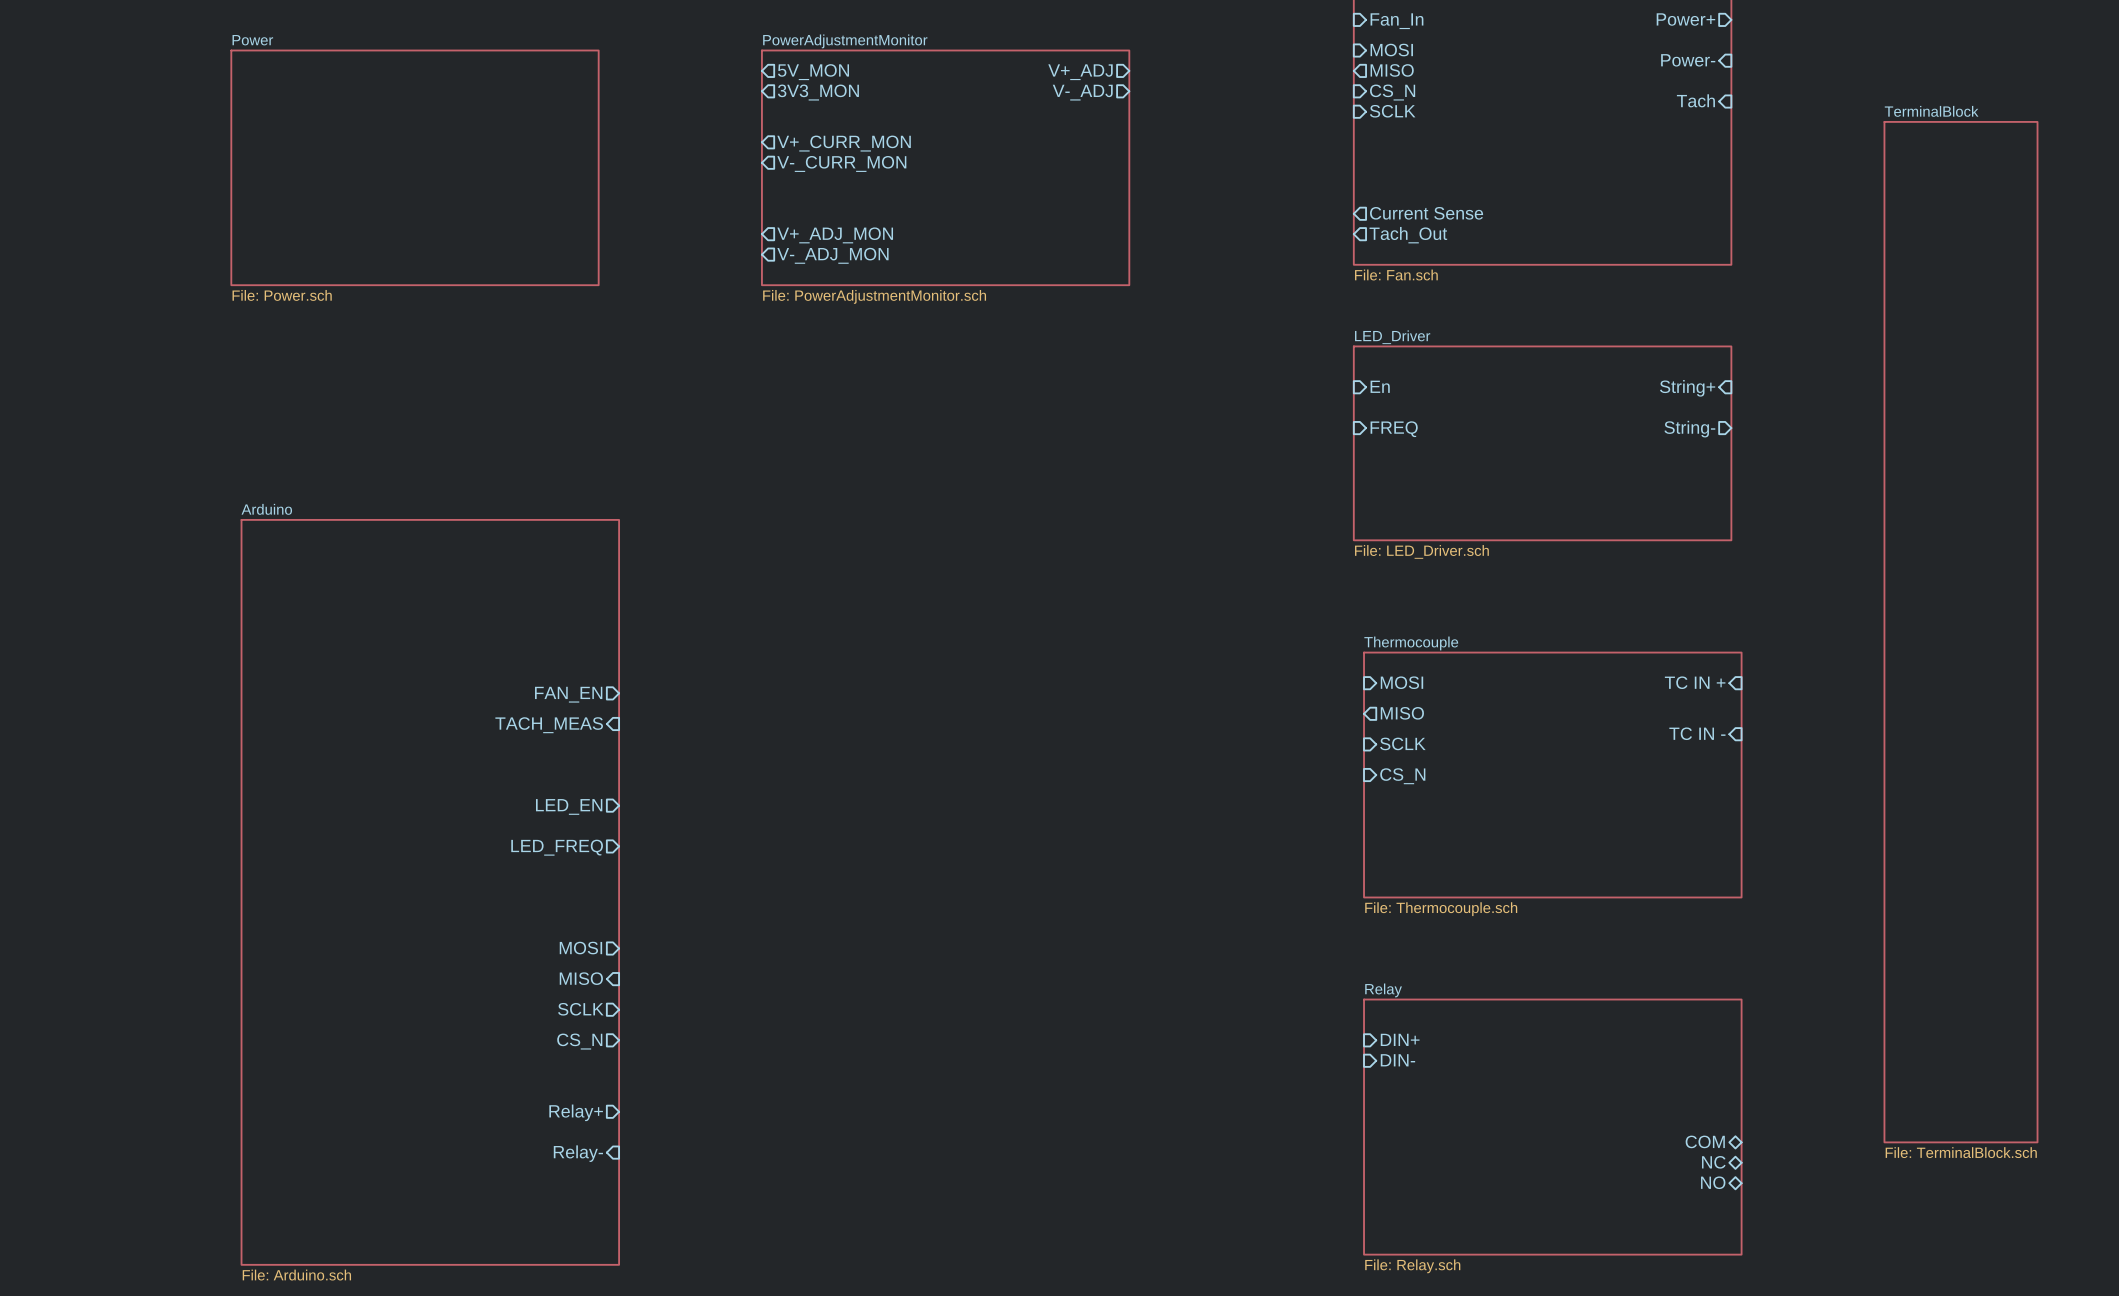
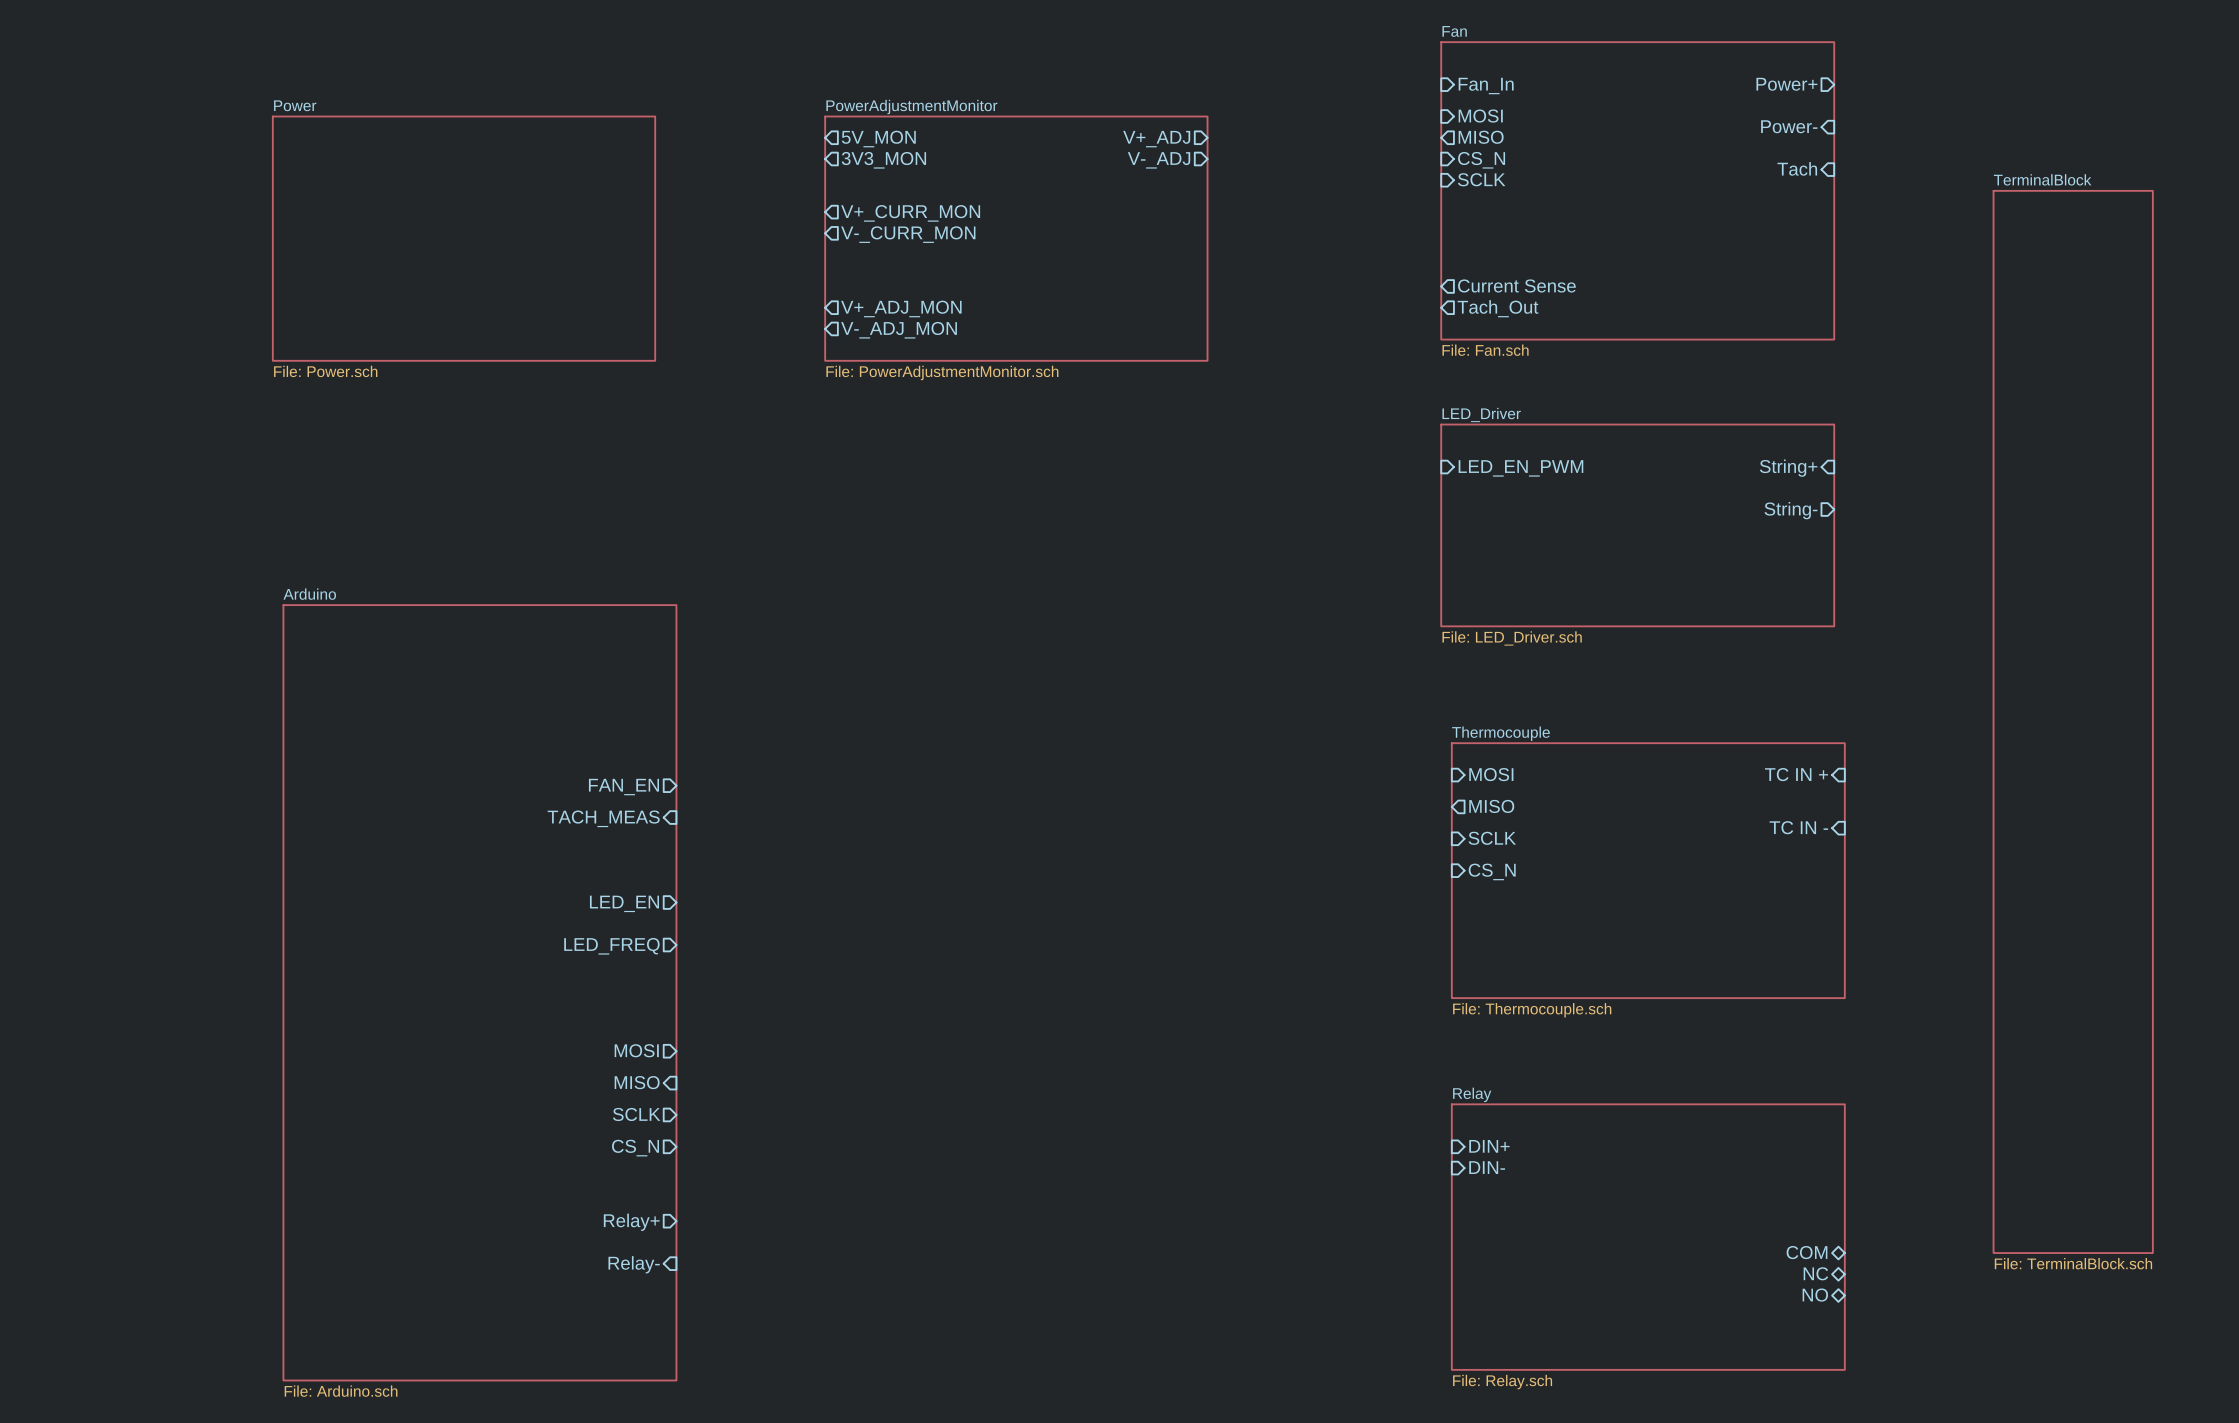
sheet pin: En (1380, 386) -> LED_EN_PWM (1520, 468)
sheet pin: FREQ (1394, 429) -> none

